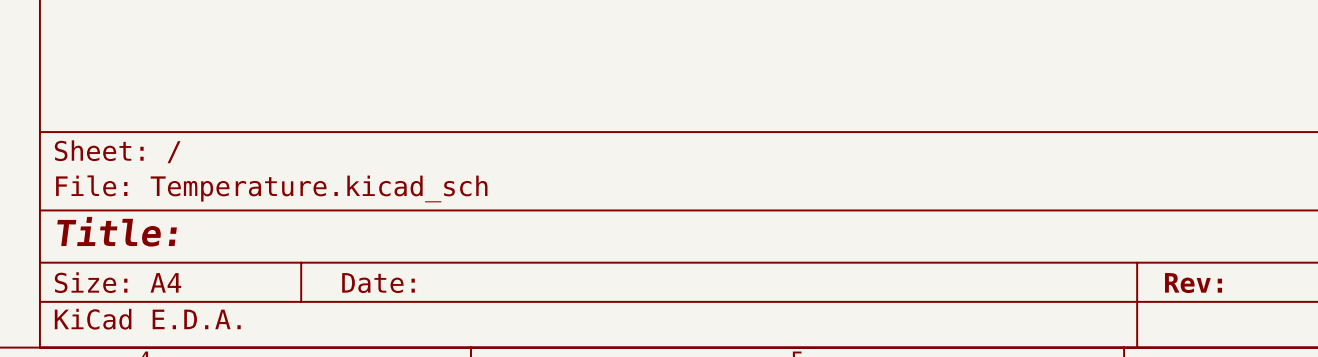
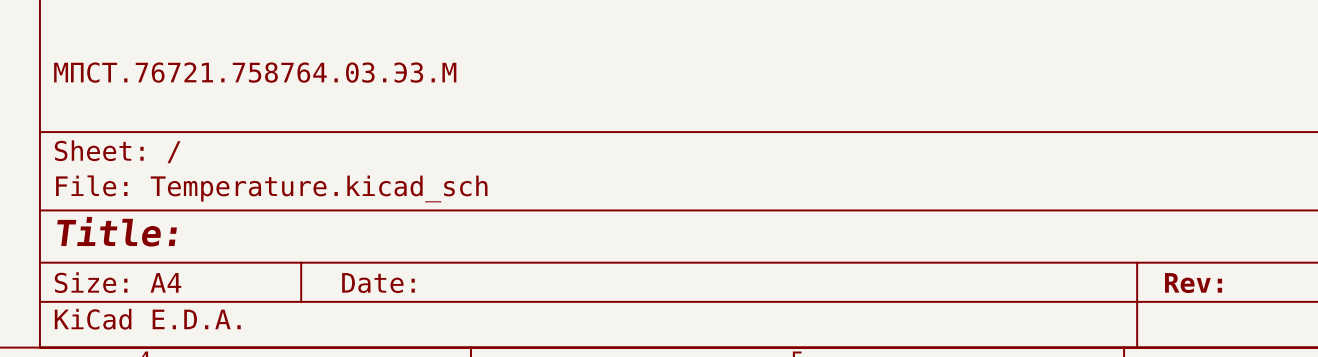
title block: none -> МПСТ.76721.758764.03.Э3.М (255, 72)

